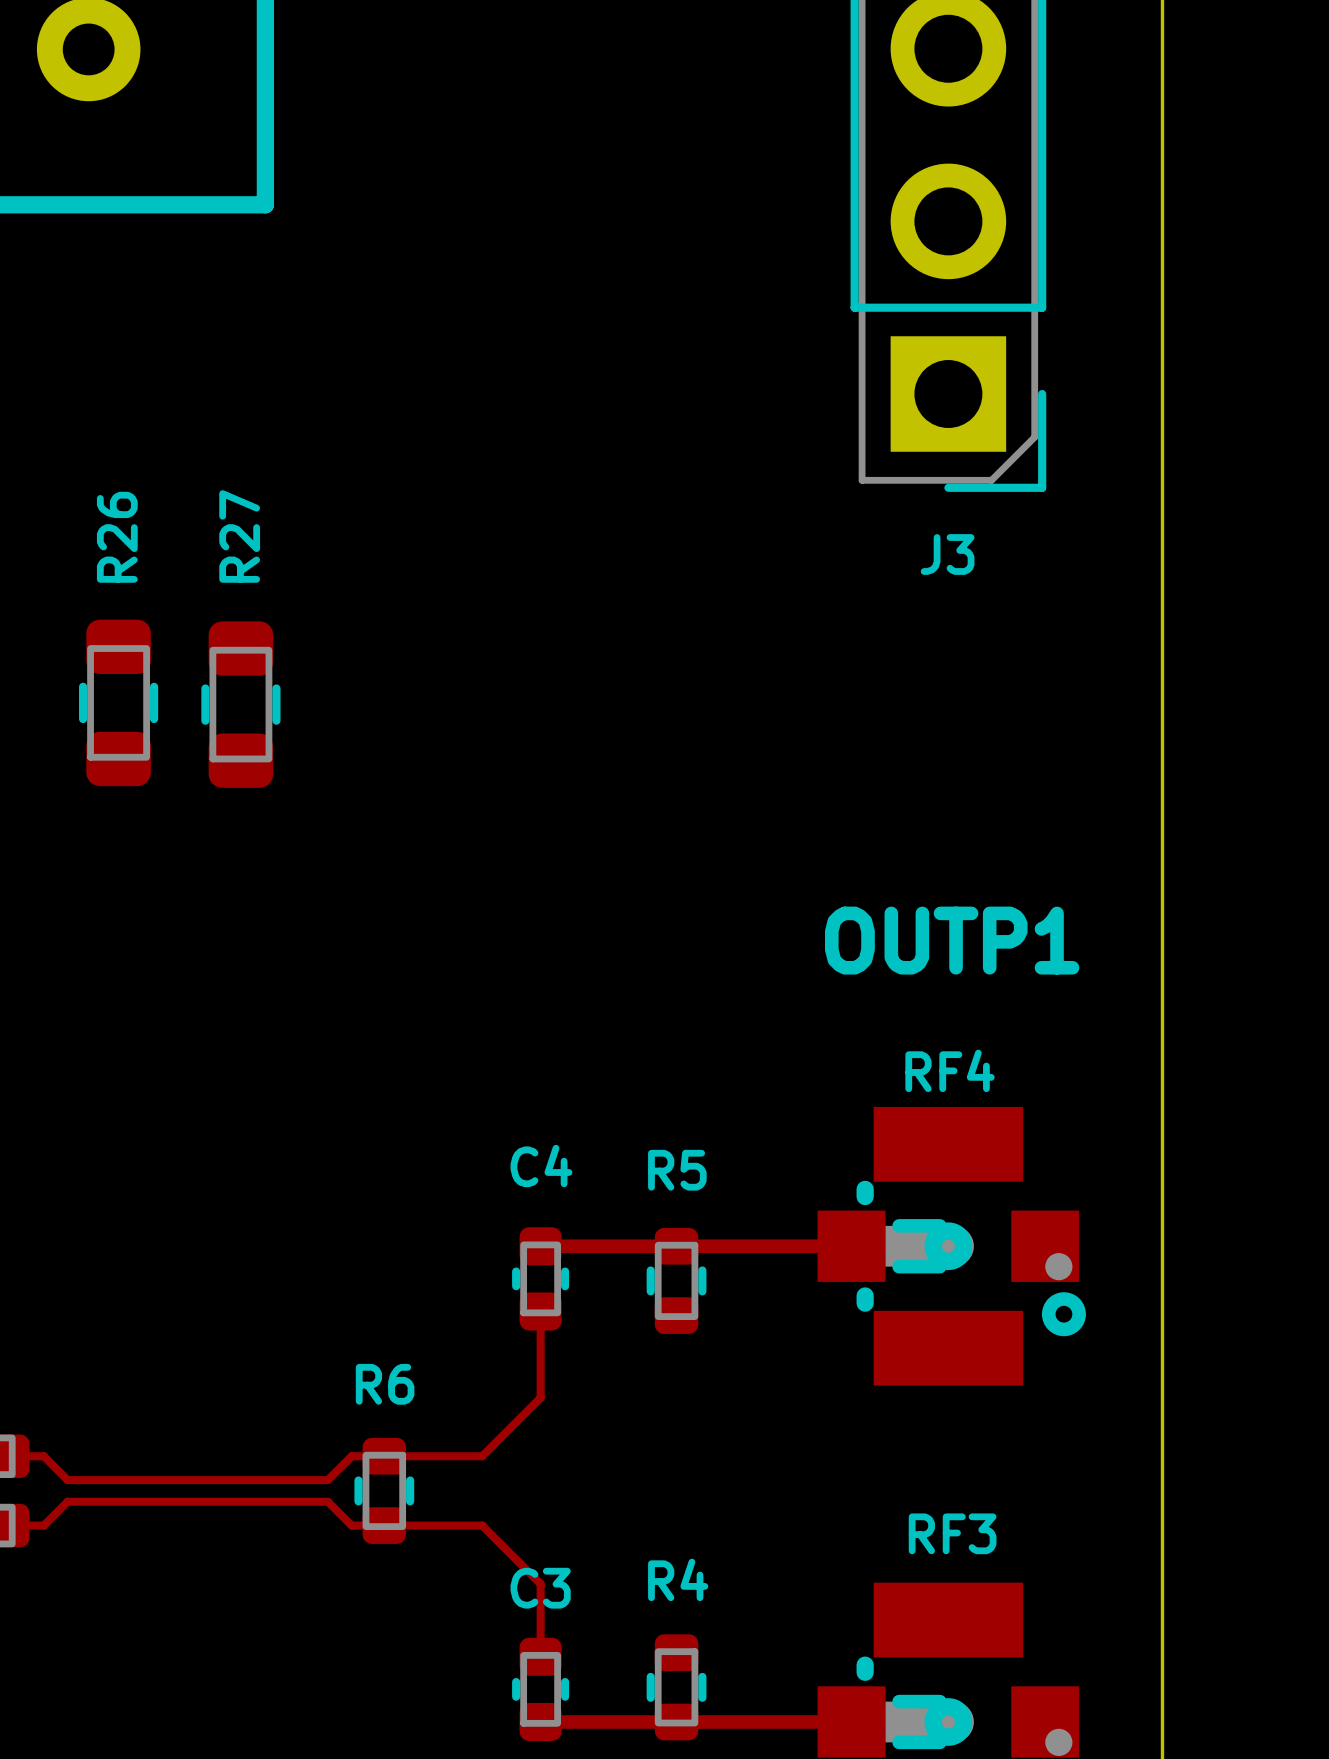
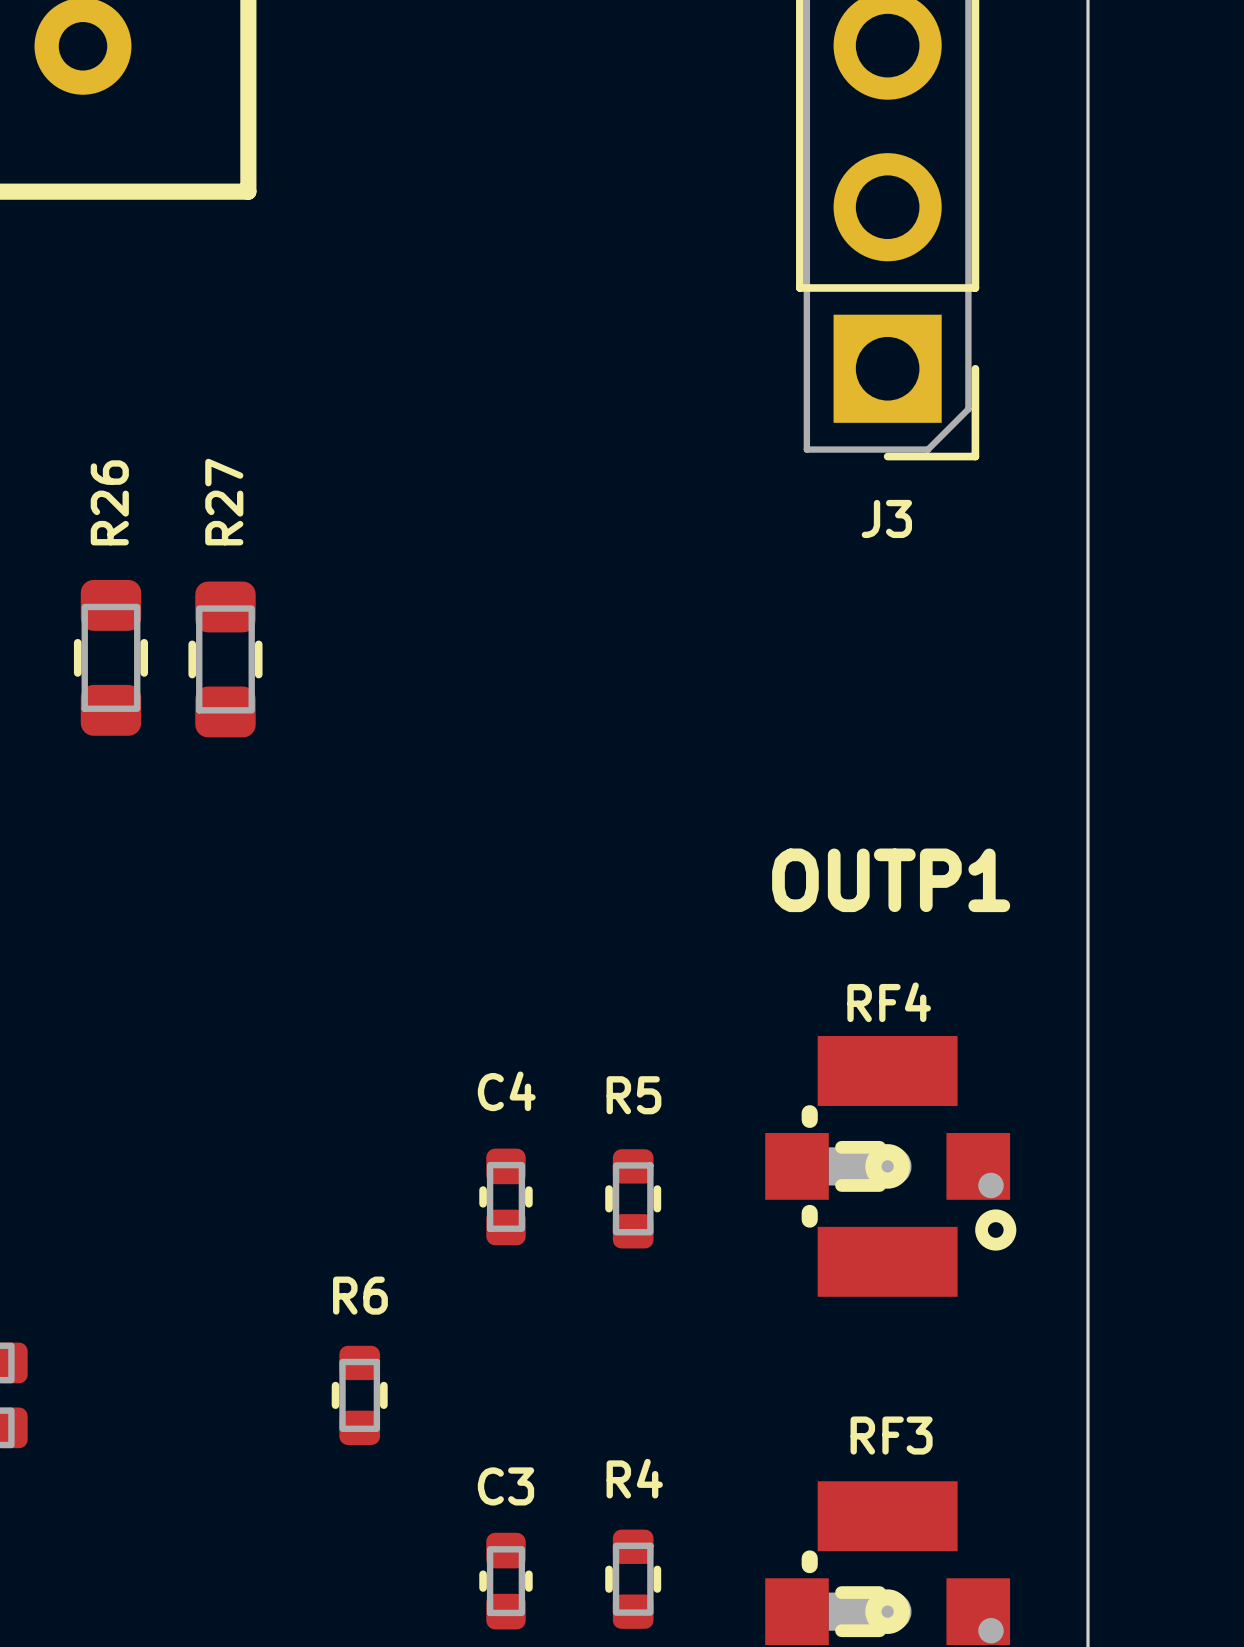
track: (540, 1246) (851, 1246) -> none
track: (540, 1311) (540, 1397) (482, 1456) (351, 1456) (327, 1480) (67, 1480) (43, 1456) (11, 1456) -> none
track: (11, 1525) (43, 1525) (67, 1501) (327, 1501) (351, 1525) (482, 1525) (540, 1584) (540, 1656) -> none
track: (540, 1721) (851, 1721) -> none

